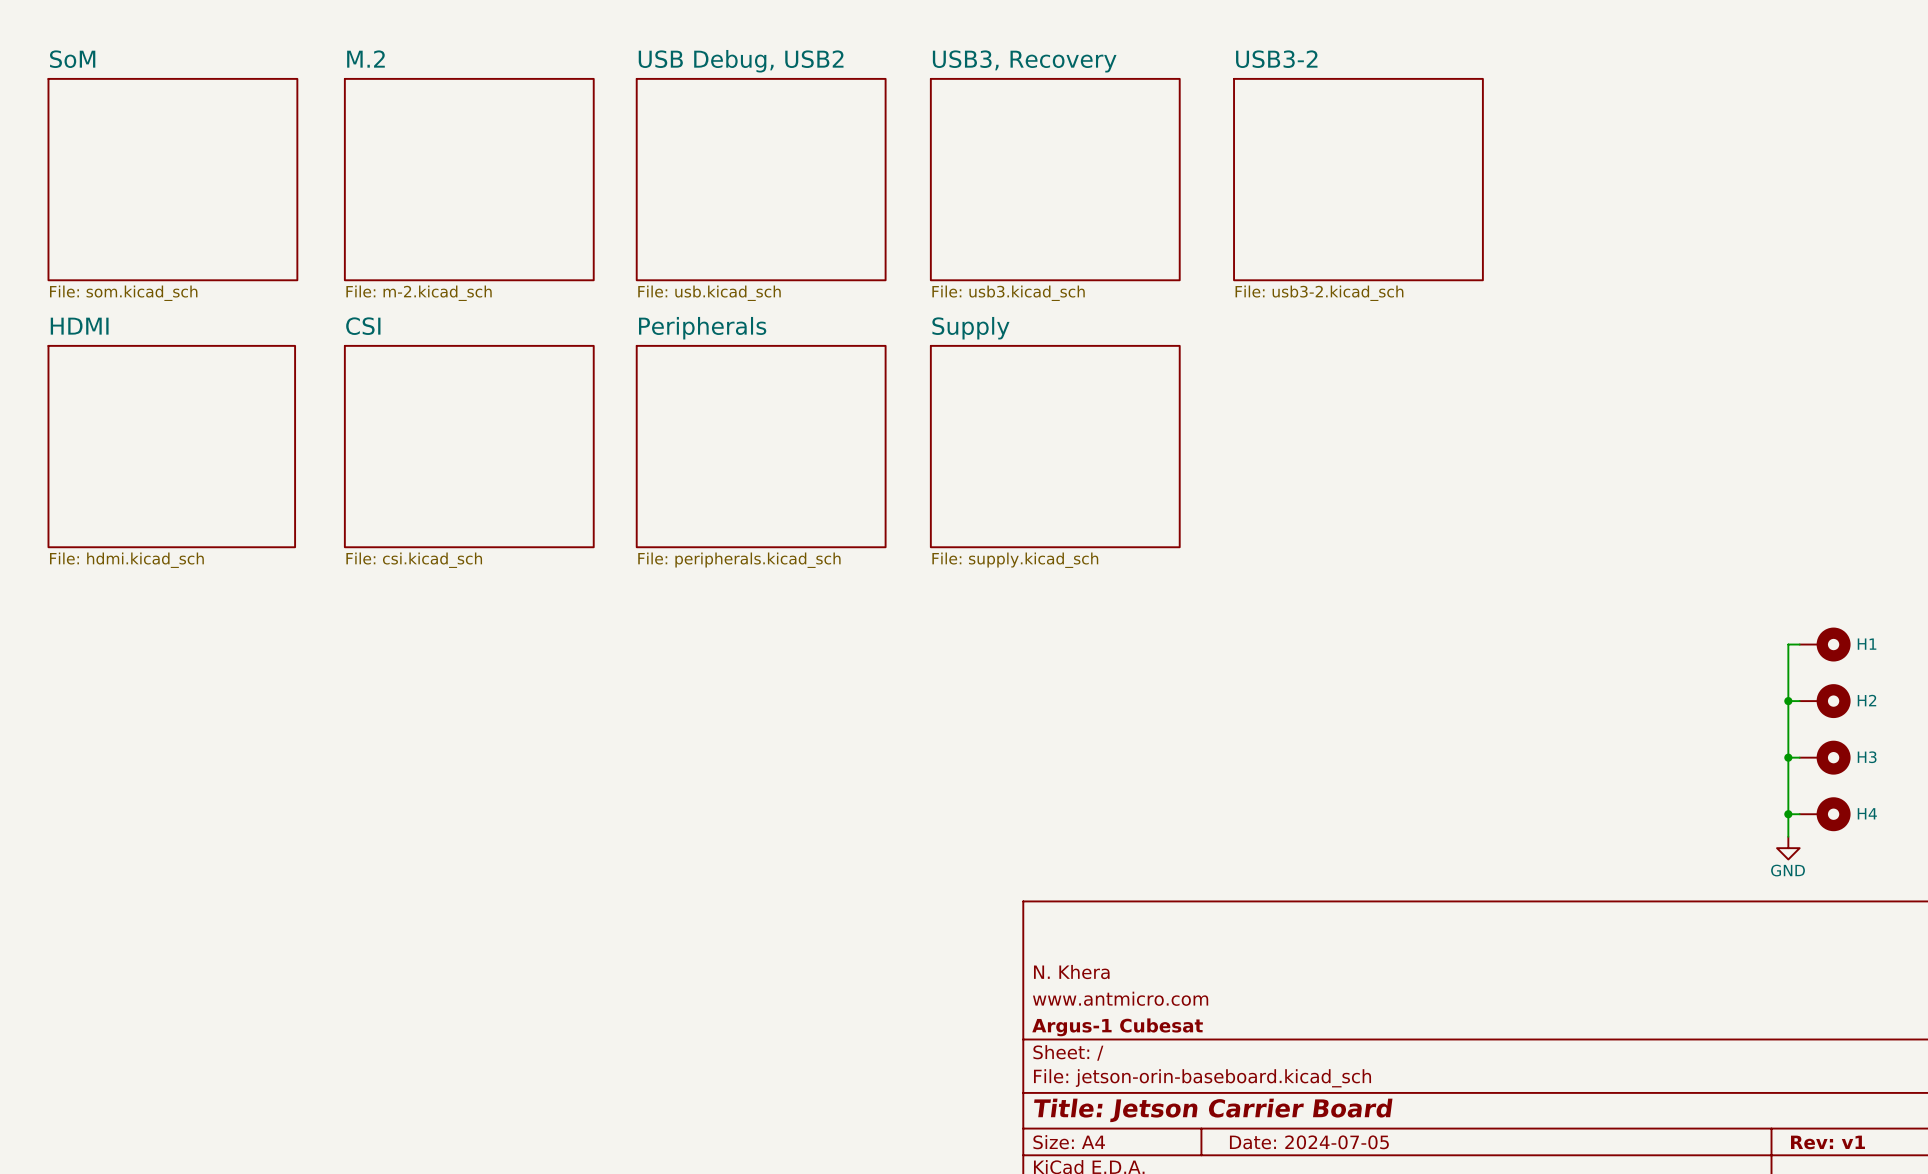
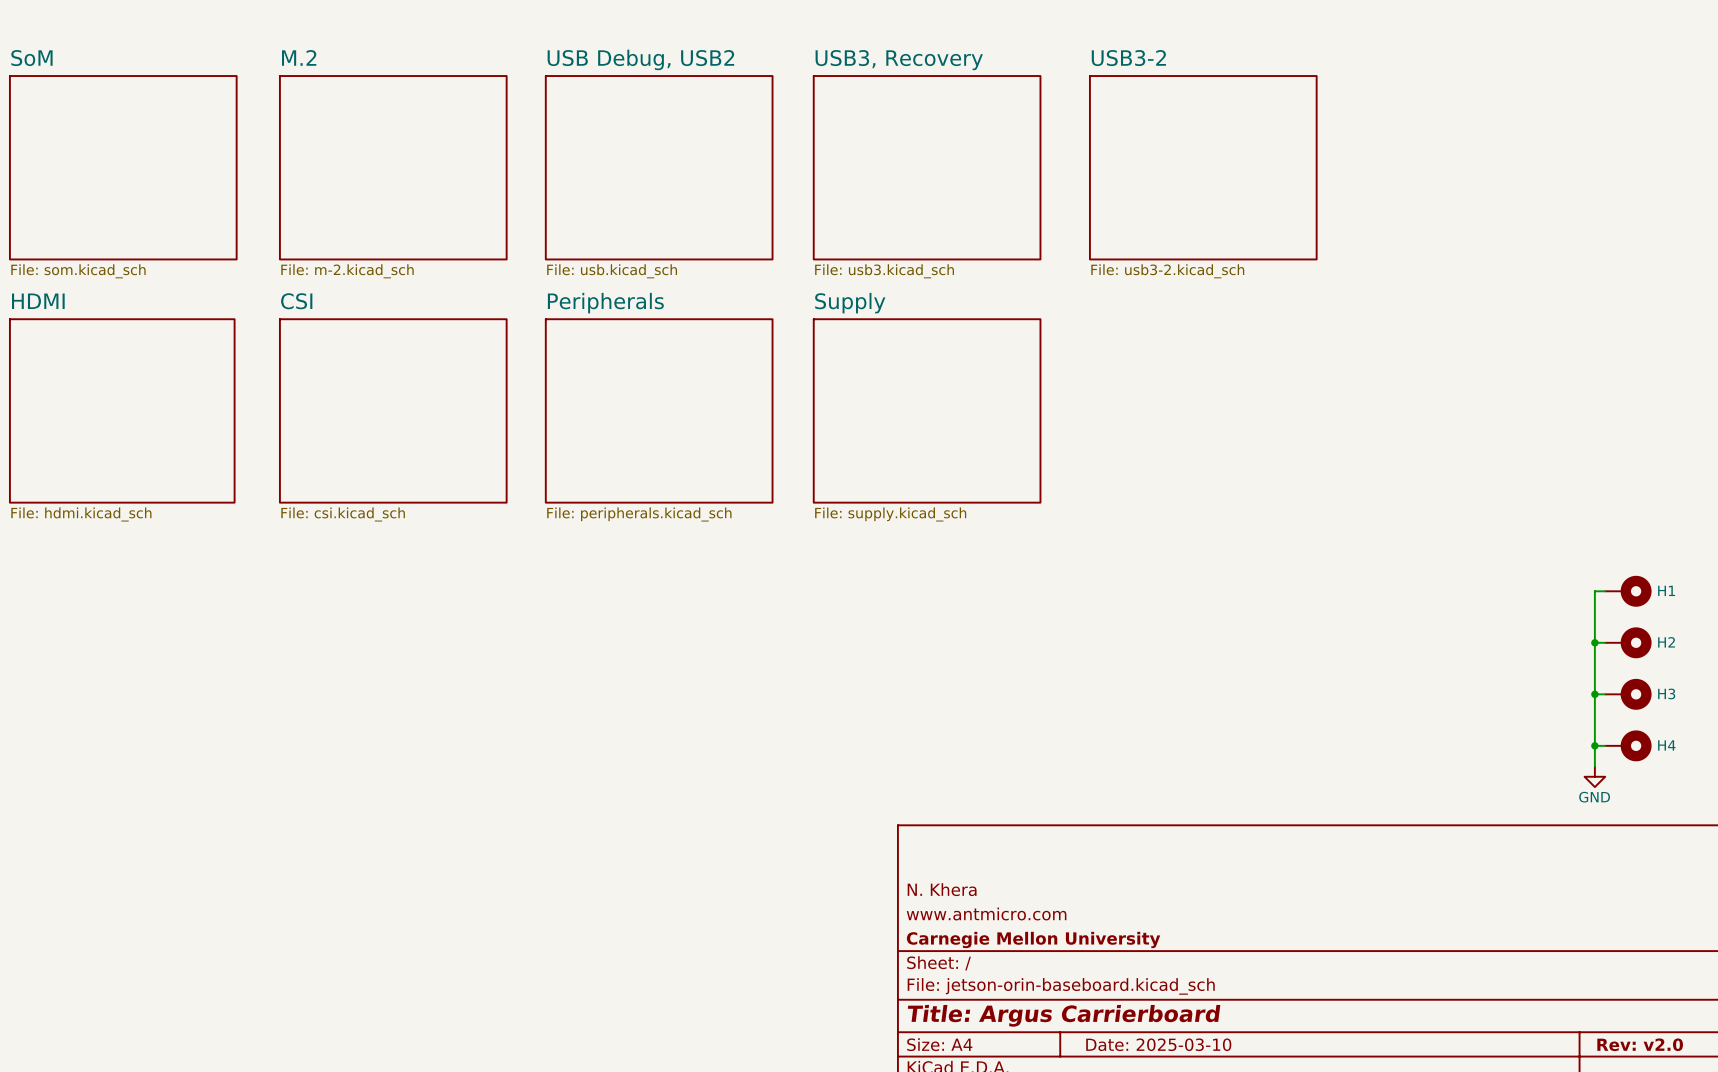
title block: Argus-1 Cubesat (1117, 1027) -> Carnegie Mellon University (1033, 939)
title block: Title: Jetson Carrier Board (1213, 1110) -> Title: Argus Carrierboard (1064, 1015)
title block: Date: 2024-07-05 (1309, 1142) -> Date: 2025-03-10 (1158, 1044)
title block: Rev: v1 (1827, 1142) -> Rev: v2.0 (1640, 1044)

